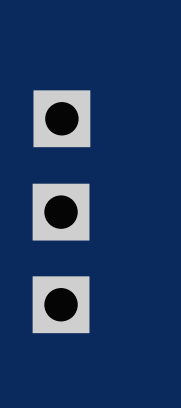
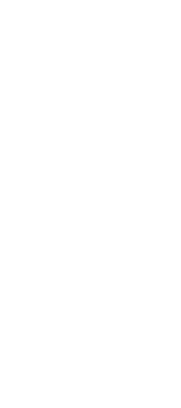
part: (61, 118) -> none
part: (61, 212) -> none
part: (61, 304) -> none

